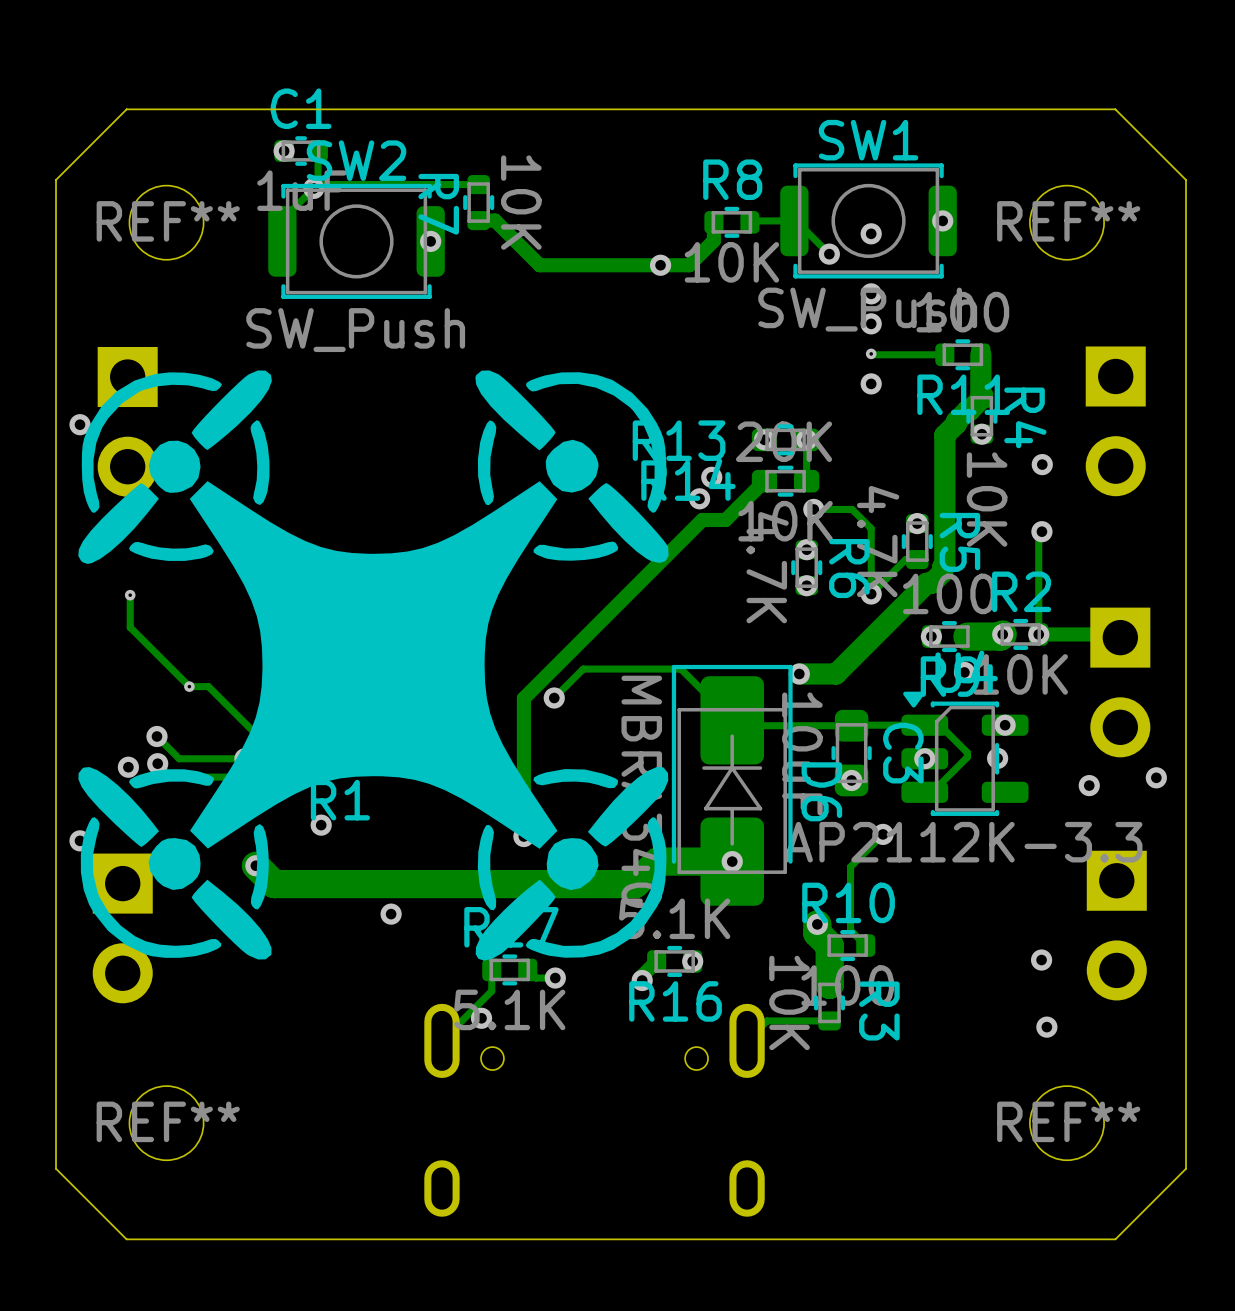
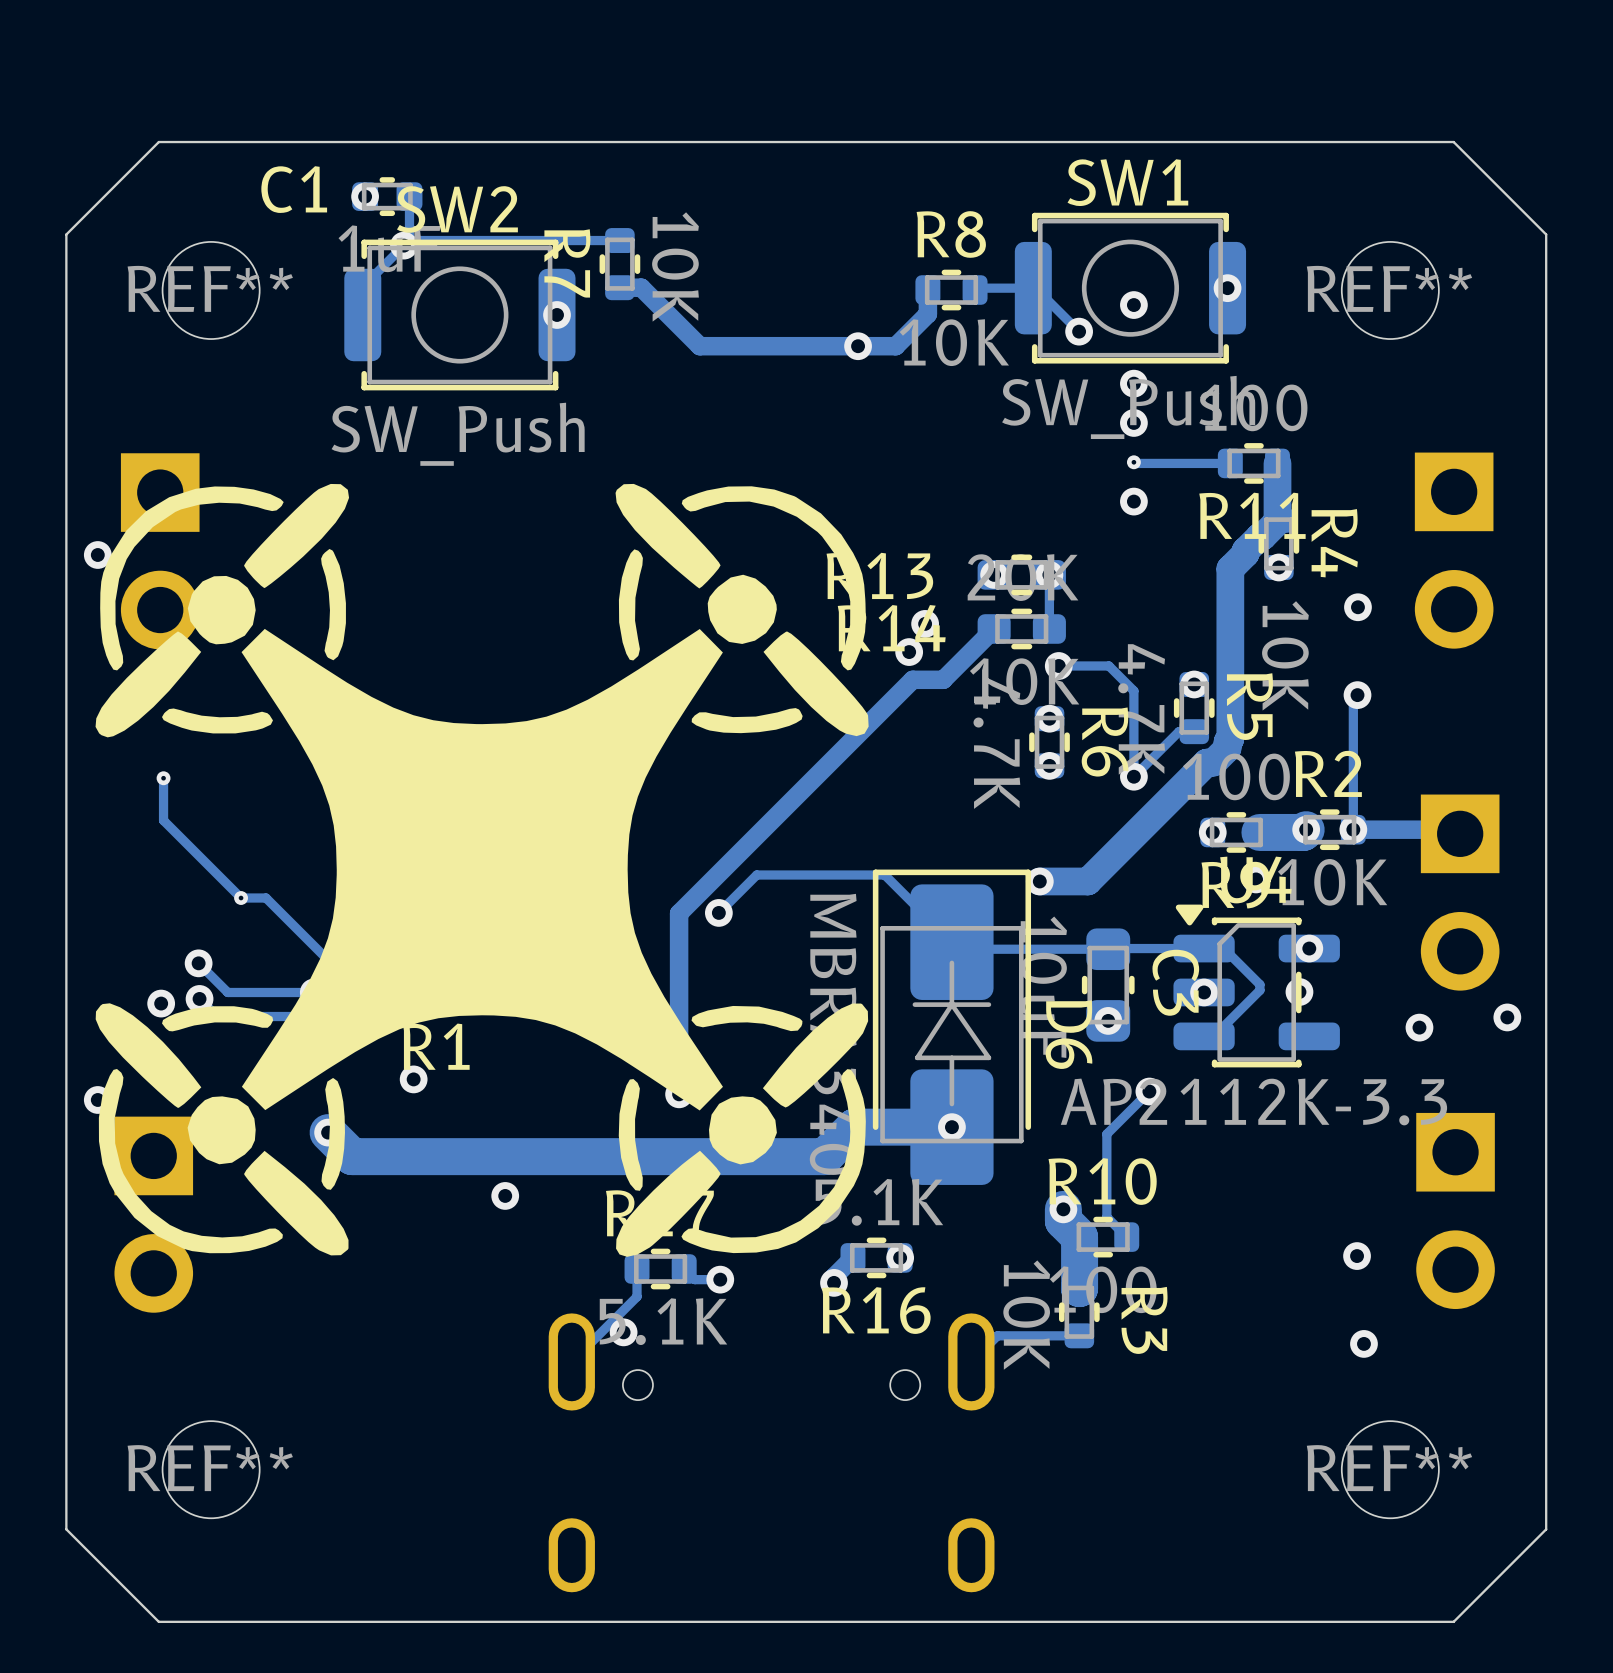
C1 name position: C1 (301, 108) -> C1 (294, 189)

